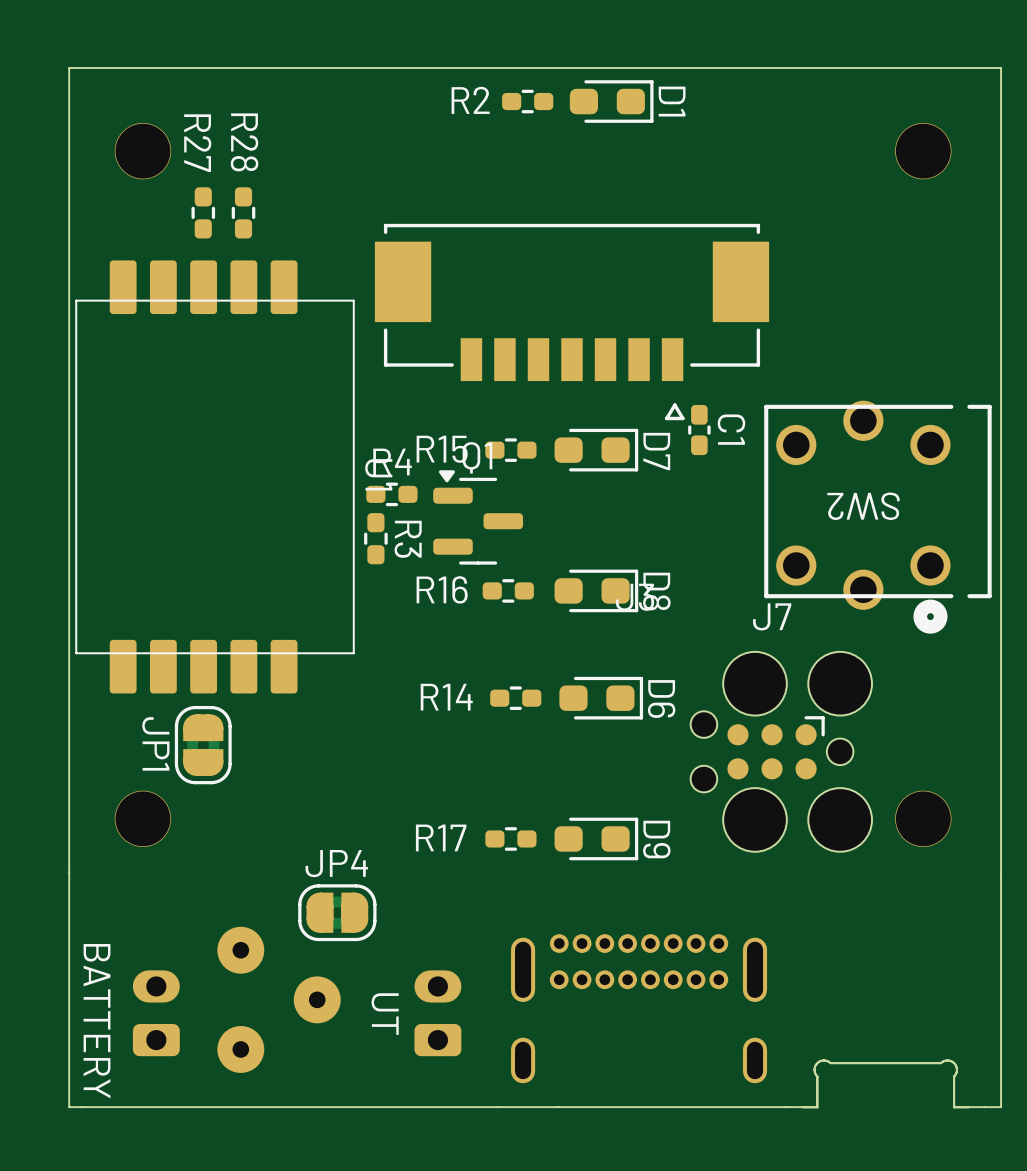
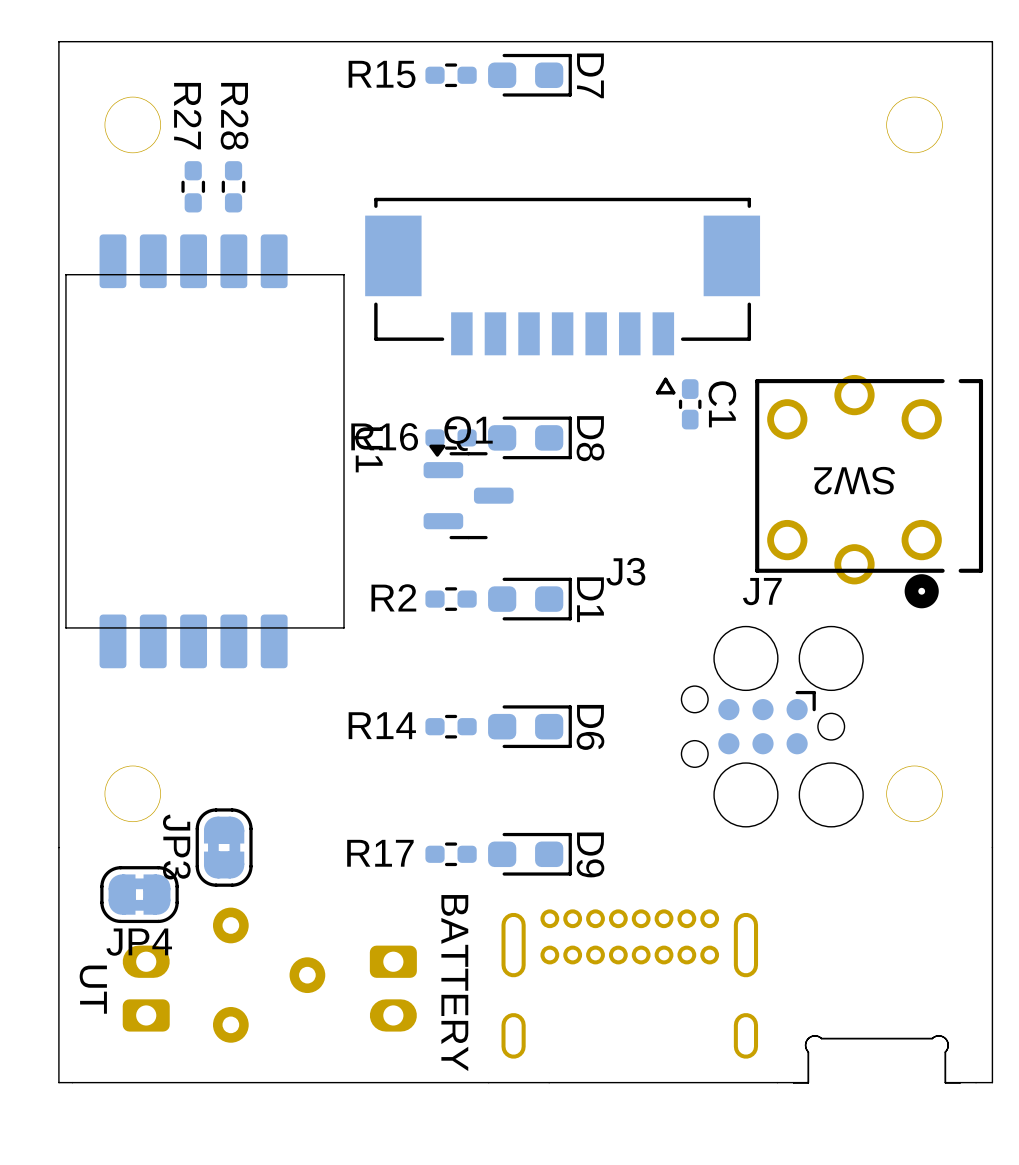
R2 position: (527, 101) -> (451, 599)
D1 position: (611, 101) -> (529, 599)
R15 position: (510, 450) -> (451, 75)
D7 position: (596, 450) -> (529, 75)
R4: (391, 494) -> none
R3: (375, 538) -> none
R16 position: (508, 590) -> (451, 437)
D8 position: (596, 590) -> (529, 437)
R14 position: (515, 698) -> (451, 726)
D6 position: (601, 698) -> (529, 726)
JP1: (203, 745) -> none
R17 position: (510, 838) -> (451, 854)
D9 position: (596, 838) -> (529, 854)
JP3: none -> (224, 847)
JP4 rotation: 0° (337, 912) -> 180° (139, 894)
JP4 position: (337, 912) -> (139, 894)
part footprint: [217, 926, 341, 1073] -> [212, 907, 326, 1043]
BATTERY: none -> (393, 988)
UT: (437, 1013) -> none
BATTERY name: BATTERY (97, 1021) -> UT (93, 989)

